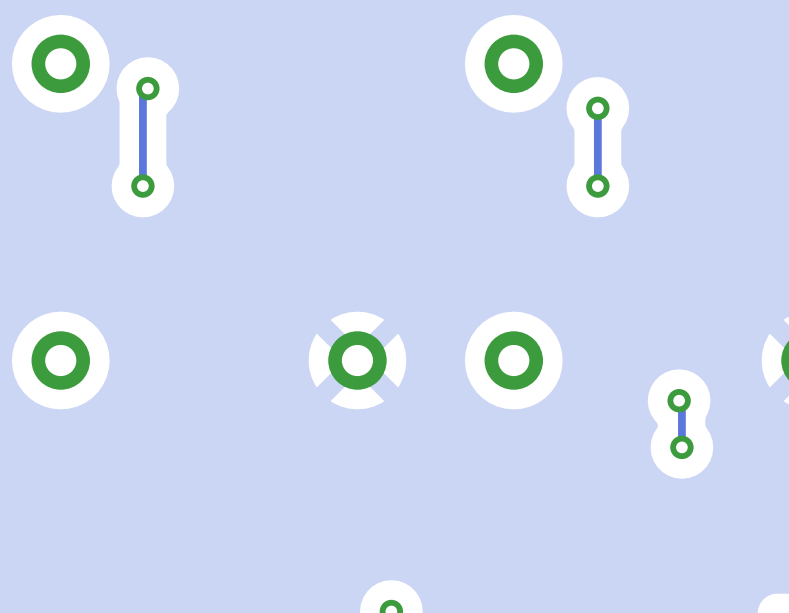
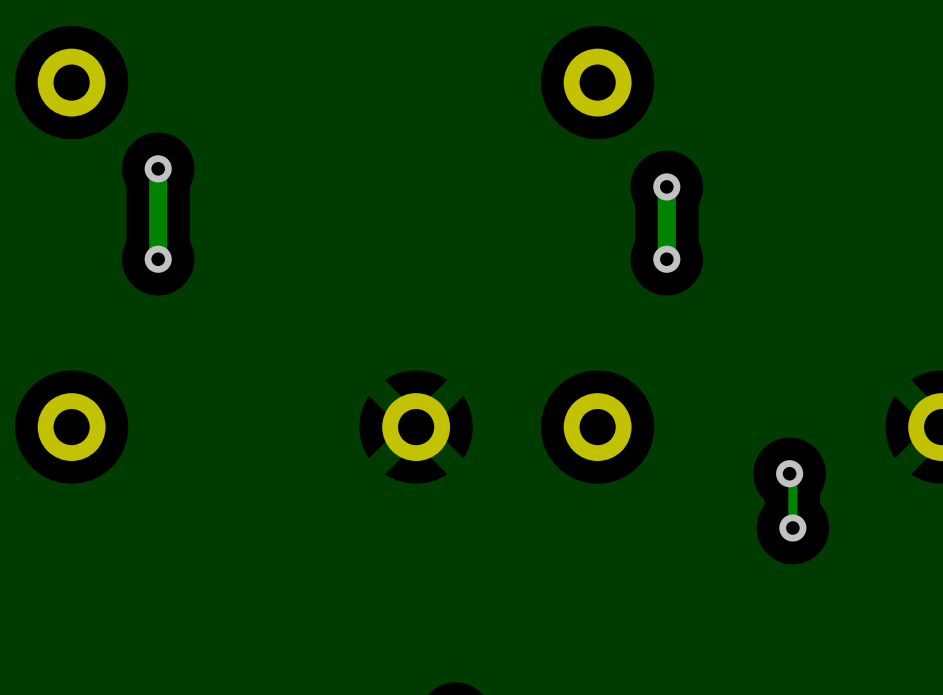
track: (147, 88) (142, 93) (142, 186) -> none
via: (147, 88) -> none
track: (597, 108) (597, 186) -> (158, 168) (158, 259)
via: (597, 108) -> none
via: none -> (158, 168)
track: none -> (666, 186) (666, 259)
via: none -> (666, 186)
via: (142, 186) -> none
via: (597, 186) -> none
via: none -> (158, 259)
via: none -> (666, 259)

